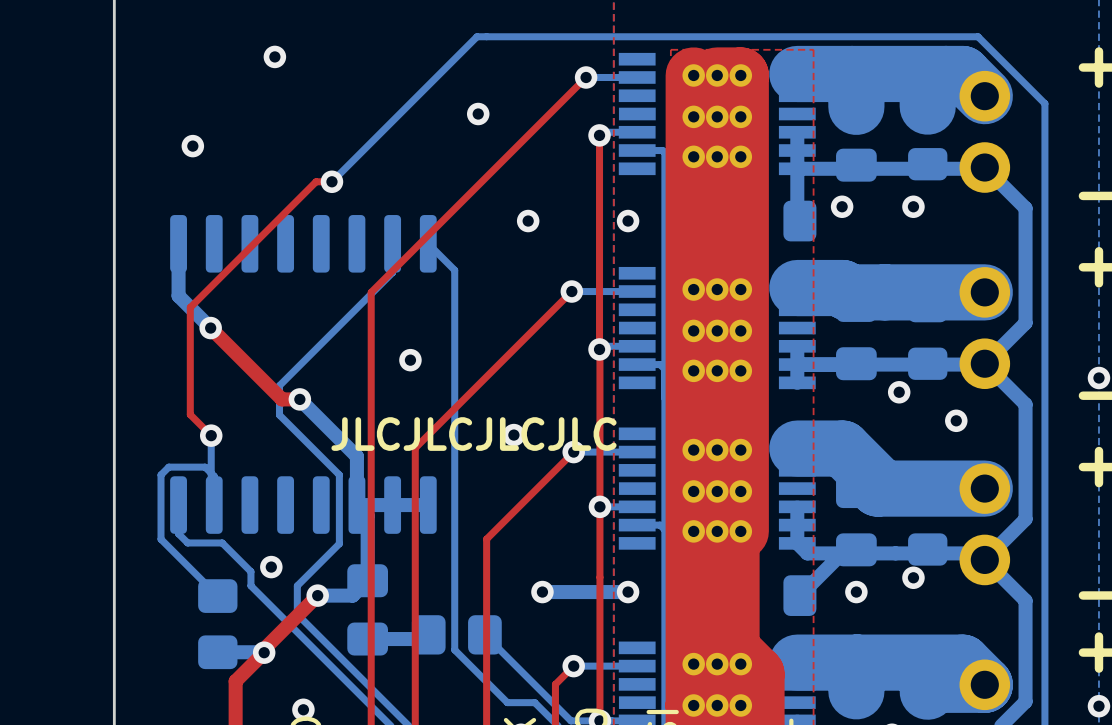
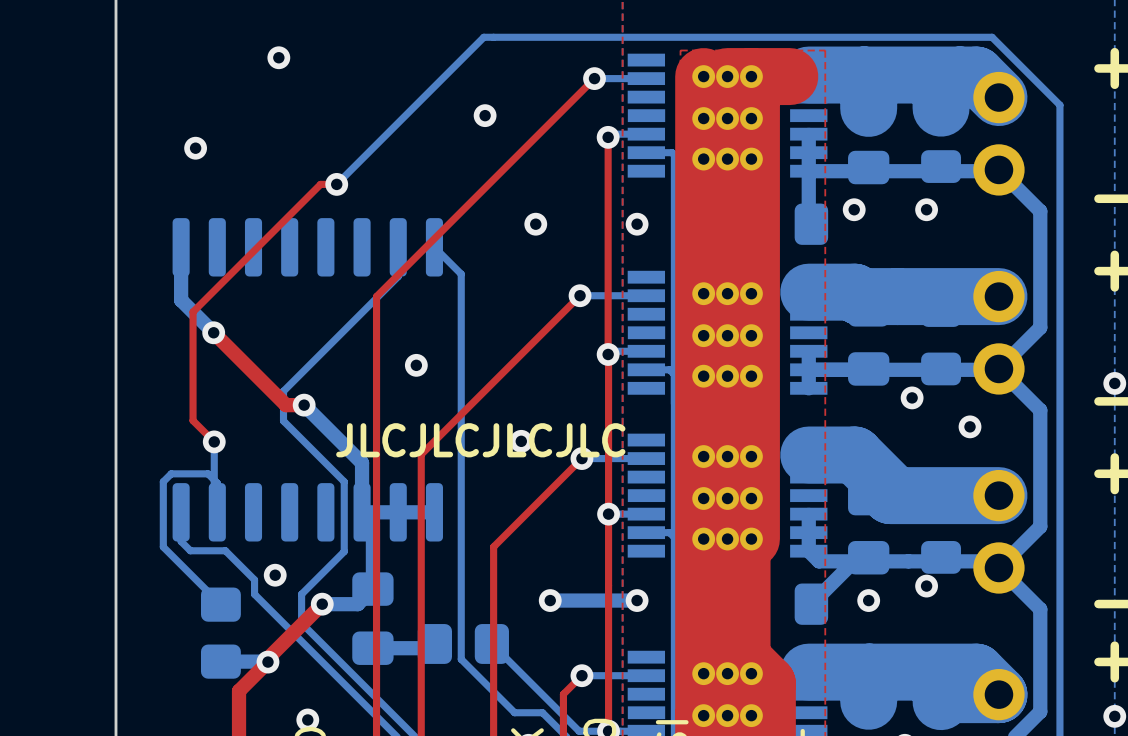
top track: none -> (751, 76) (789, 76)

